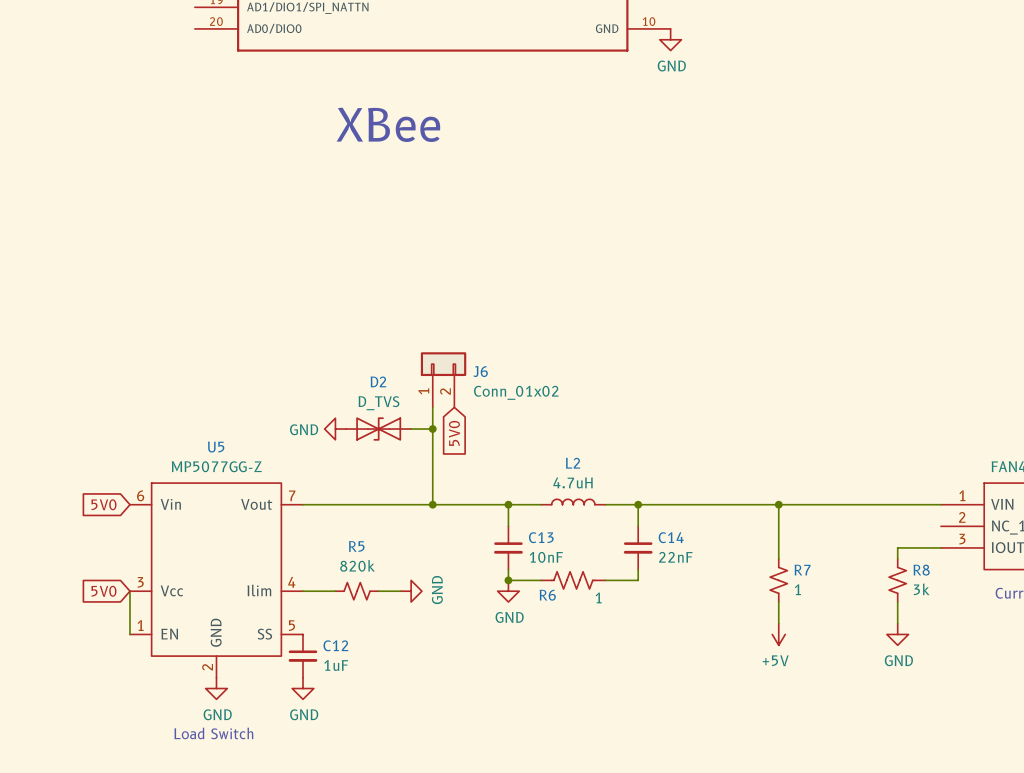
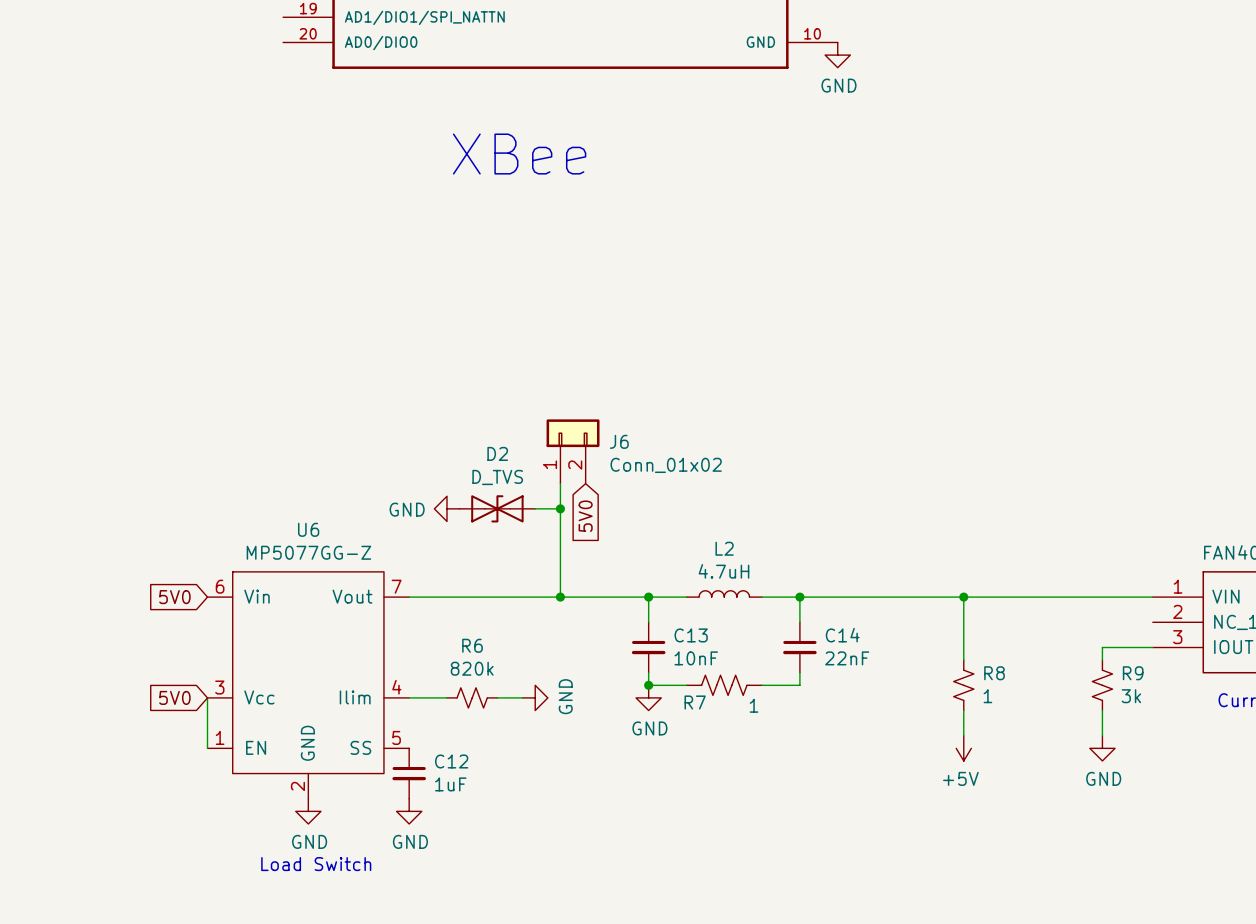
U5 name: U5 (216, 447) -> U6 (308, 529)
R5 name: R5 (356, 546) -> R6 (472, 645)
R7 name: R7 (802, 570) -> R8 (994, 673)
R8 name: R8 (921, 570) -> R9 (1133, 673)
R6 name: R6 (547, 595) -> R7 (695, 702)

